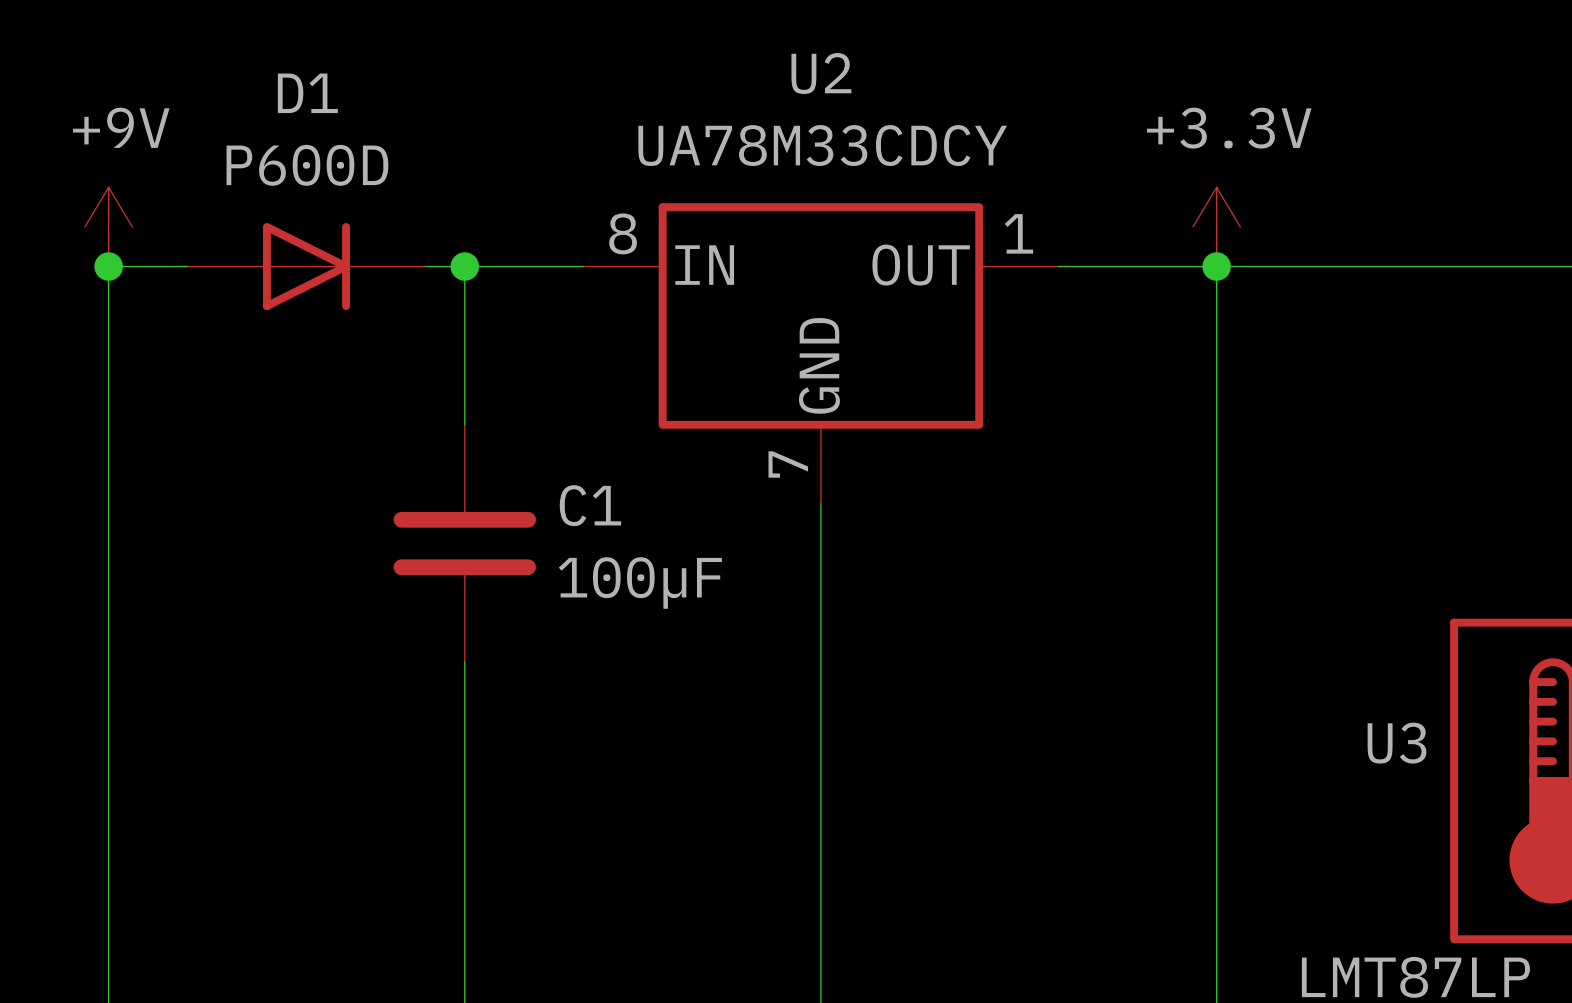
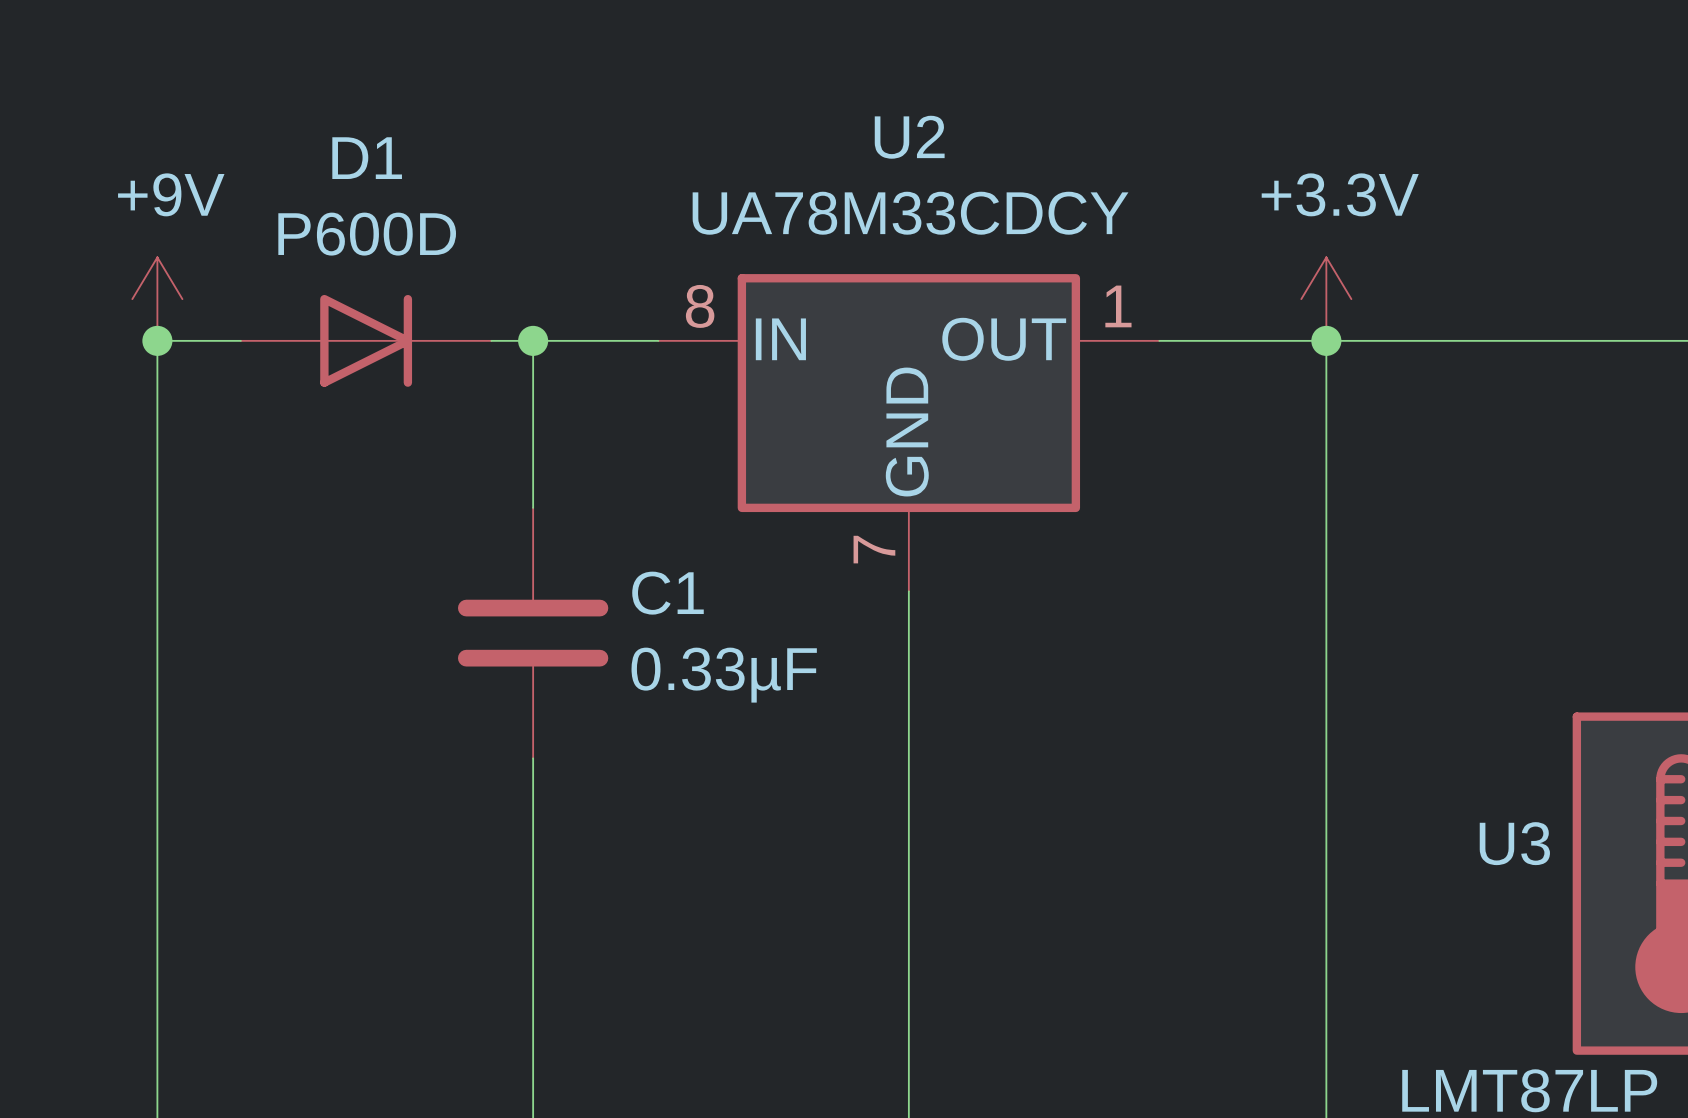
C1 value: 100µF (640, 582) -> 0.33µF (724, 675)

